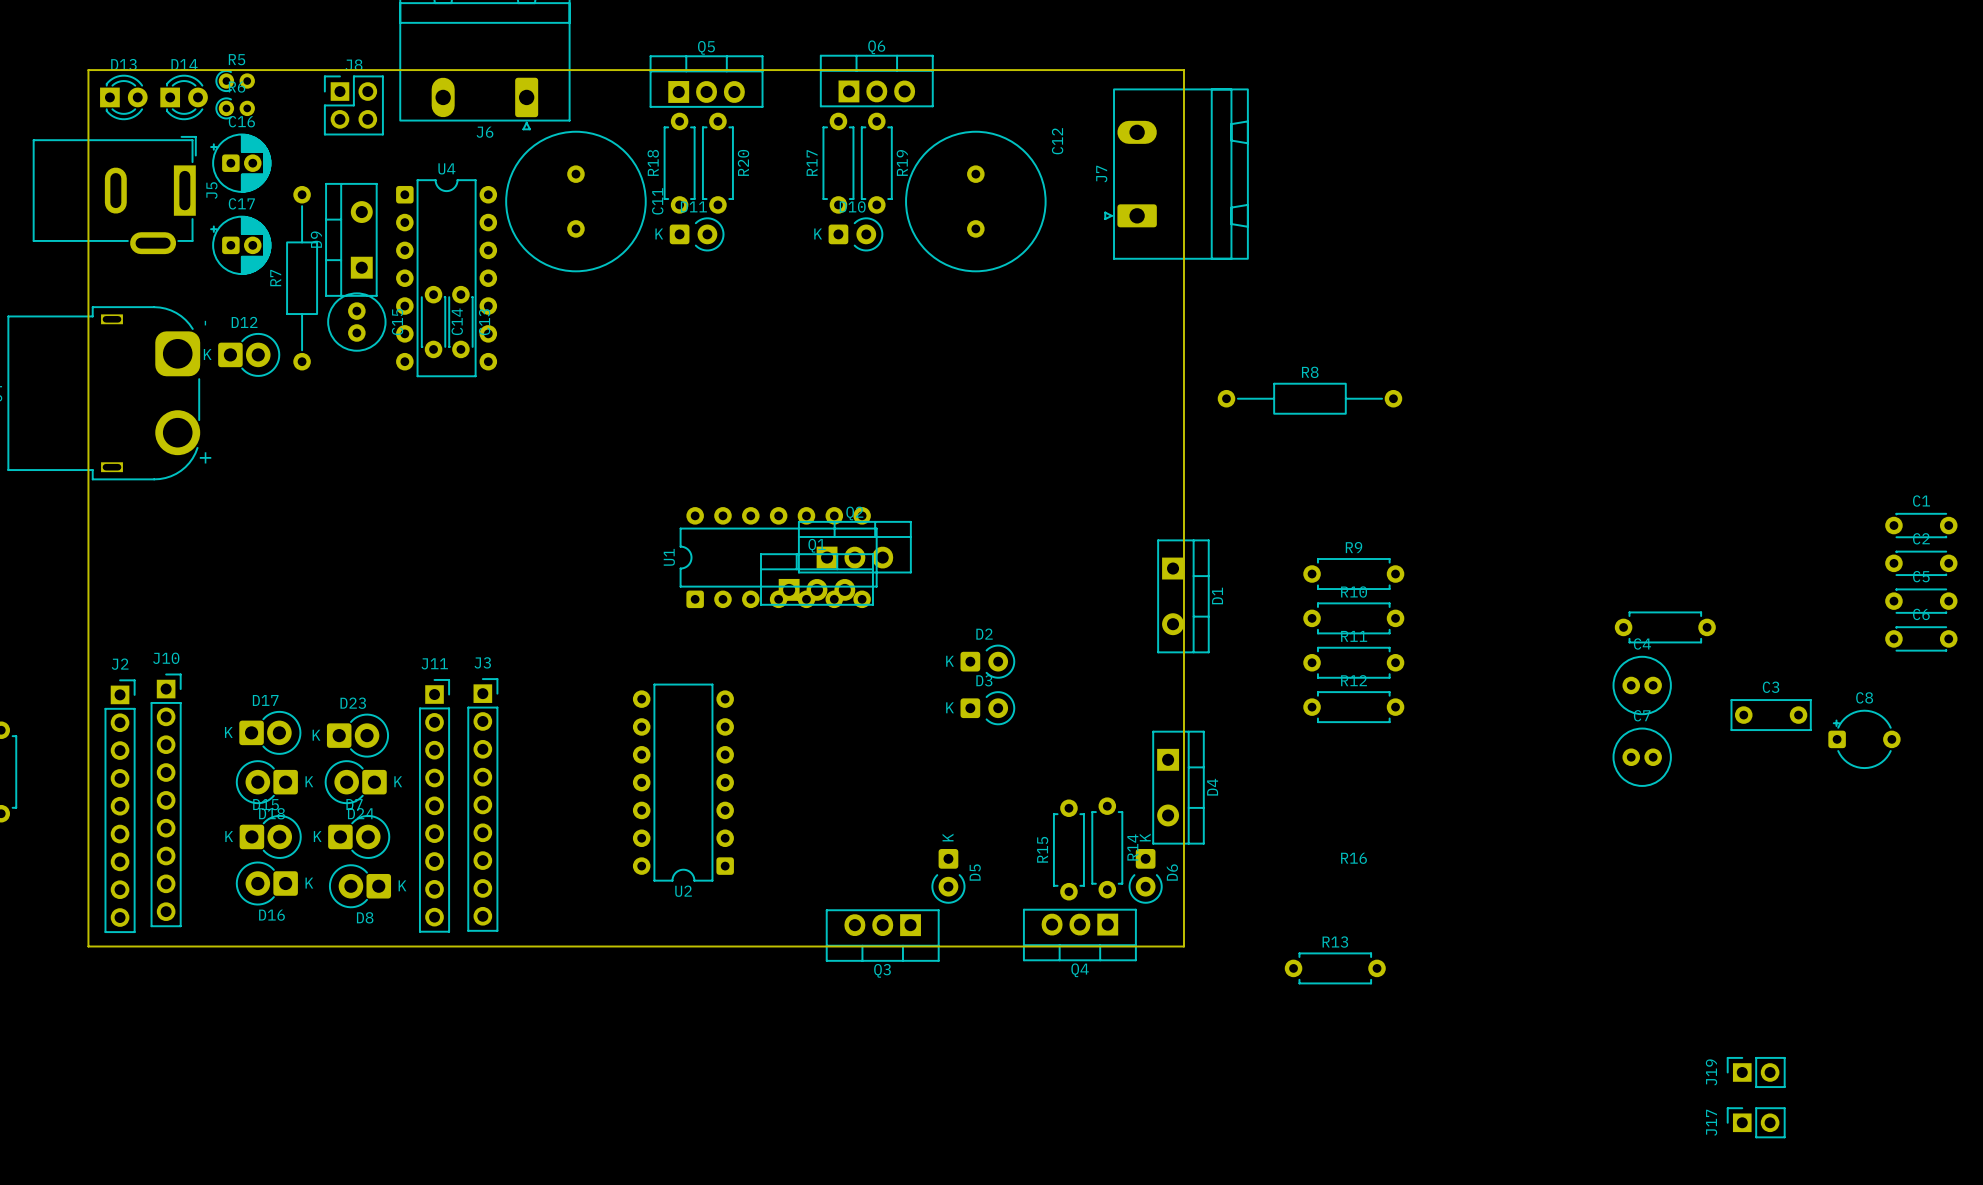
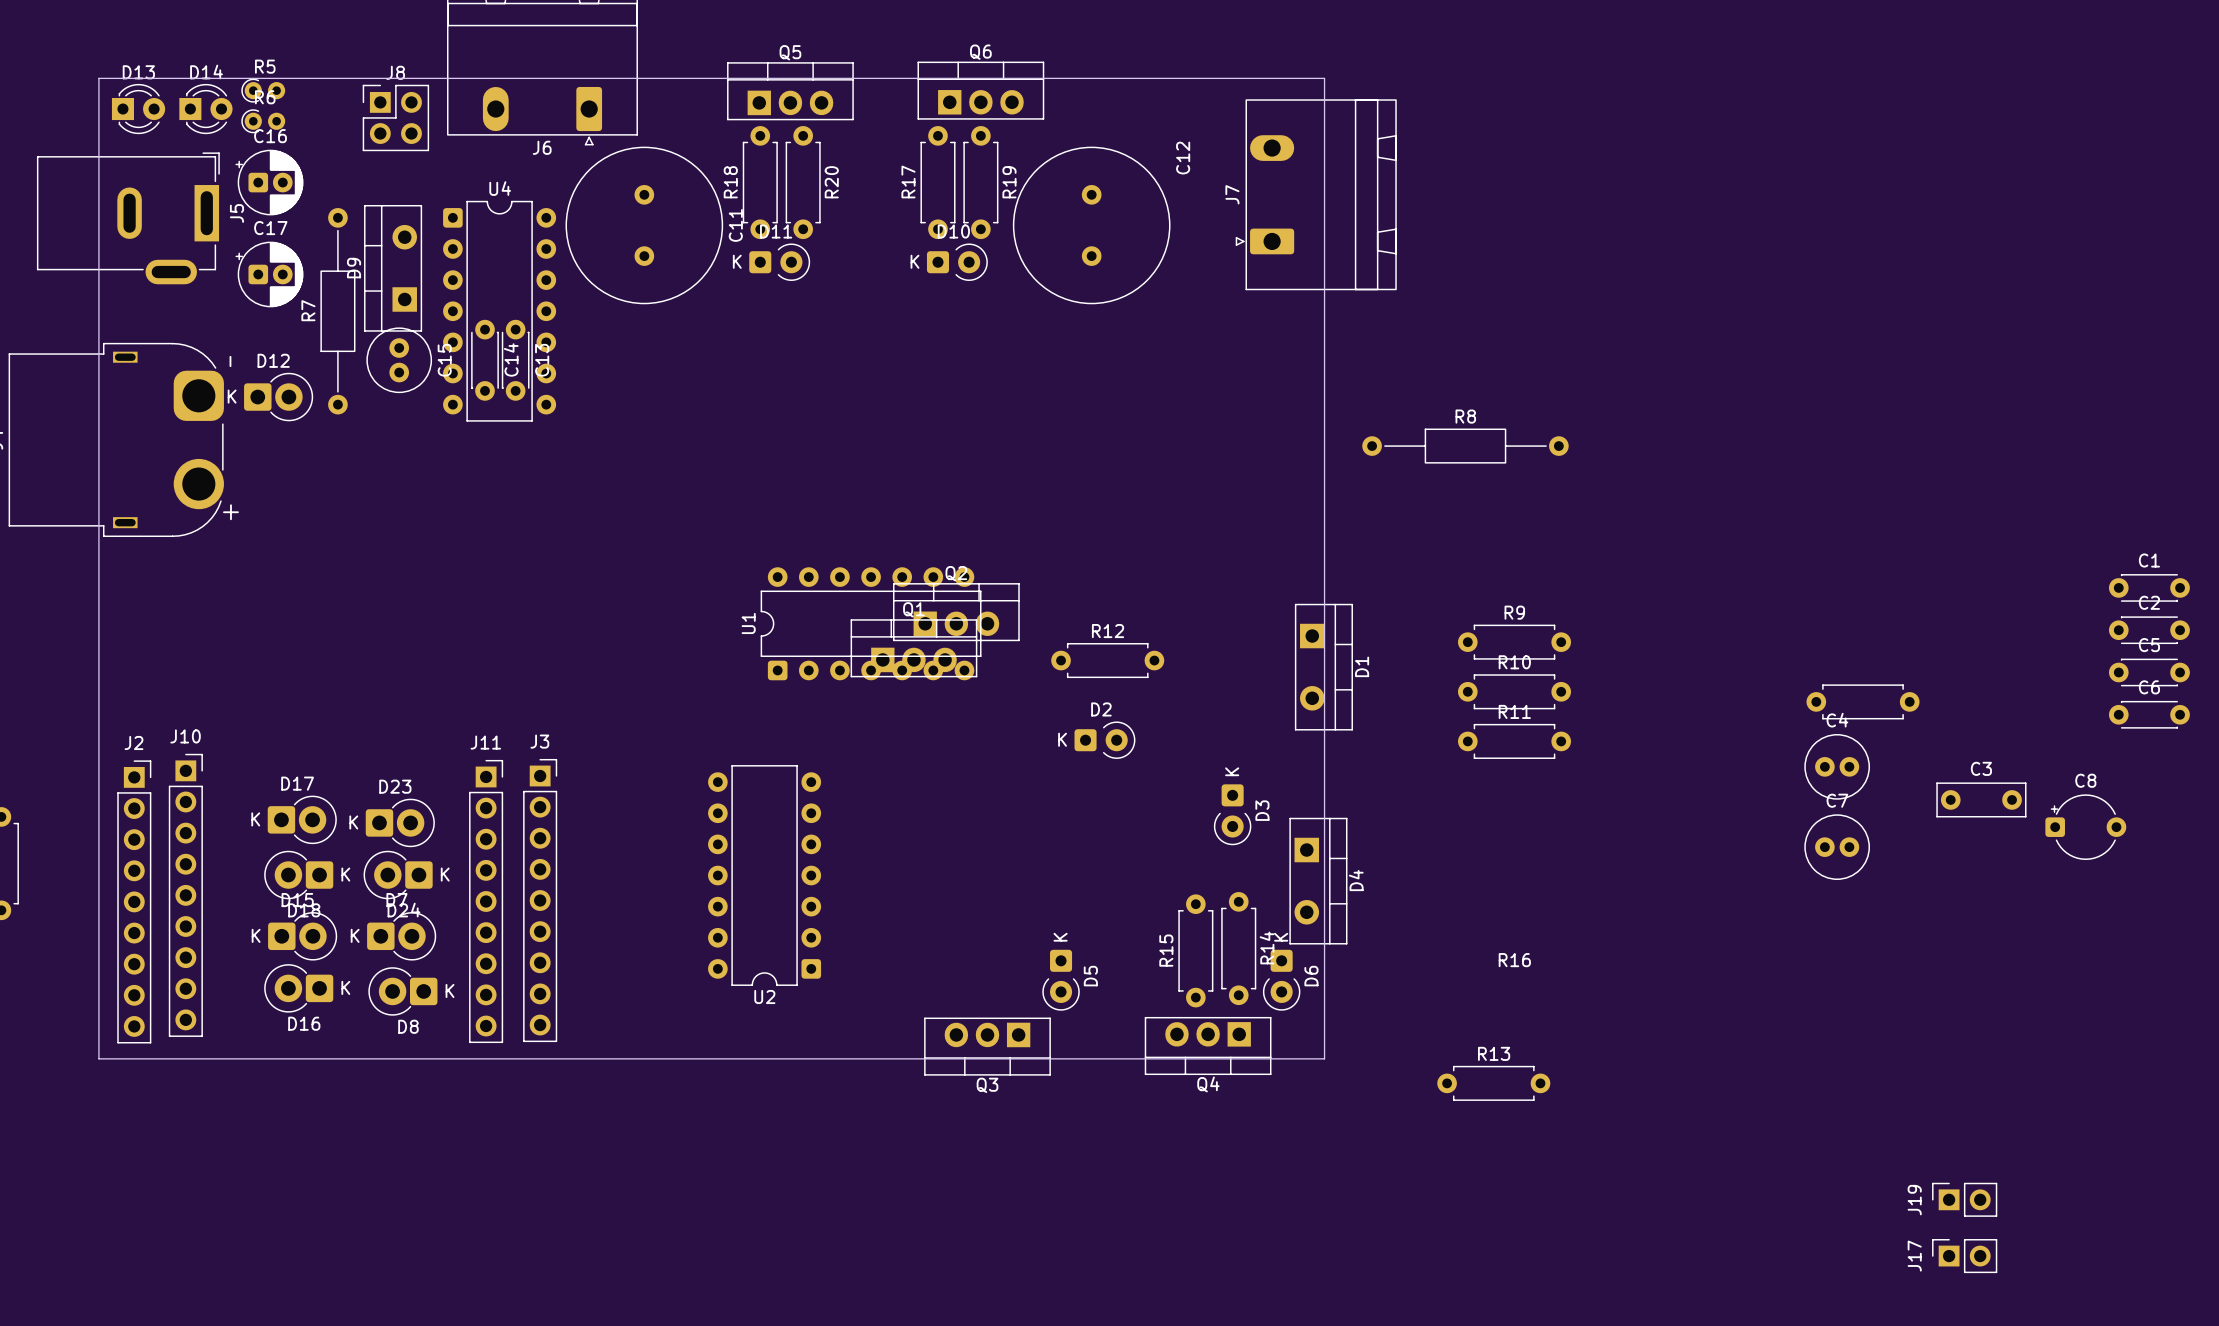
R12 position: (1353, 707) -> (1107, 660)
D3 rotation: 0° (987, 708) -> 90° clockwise (1232, 814)
D3 position: (987, 708) -> (1232, 814)

